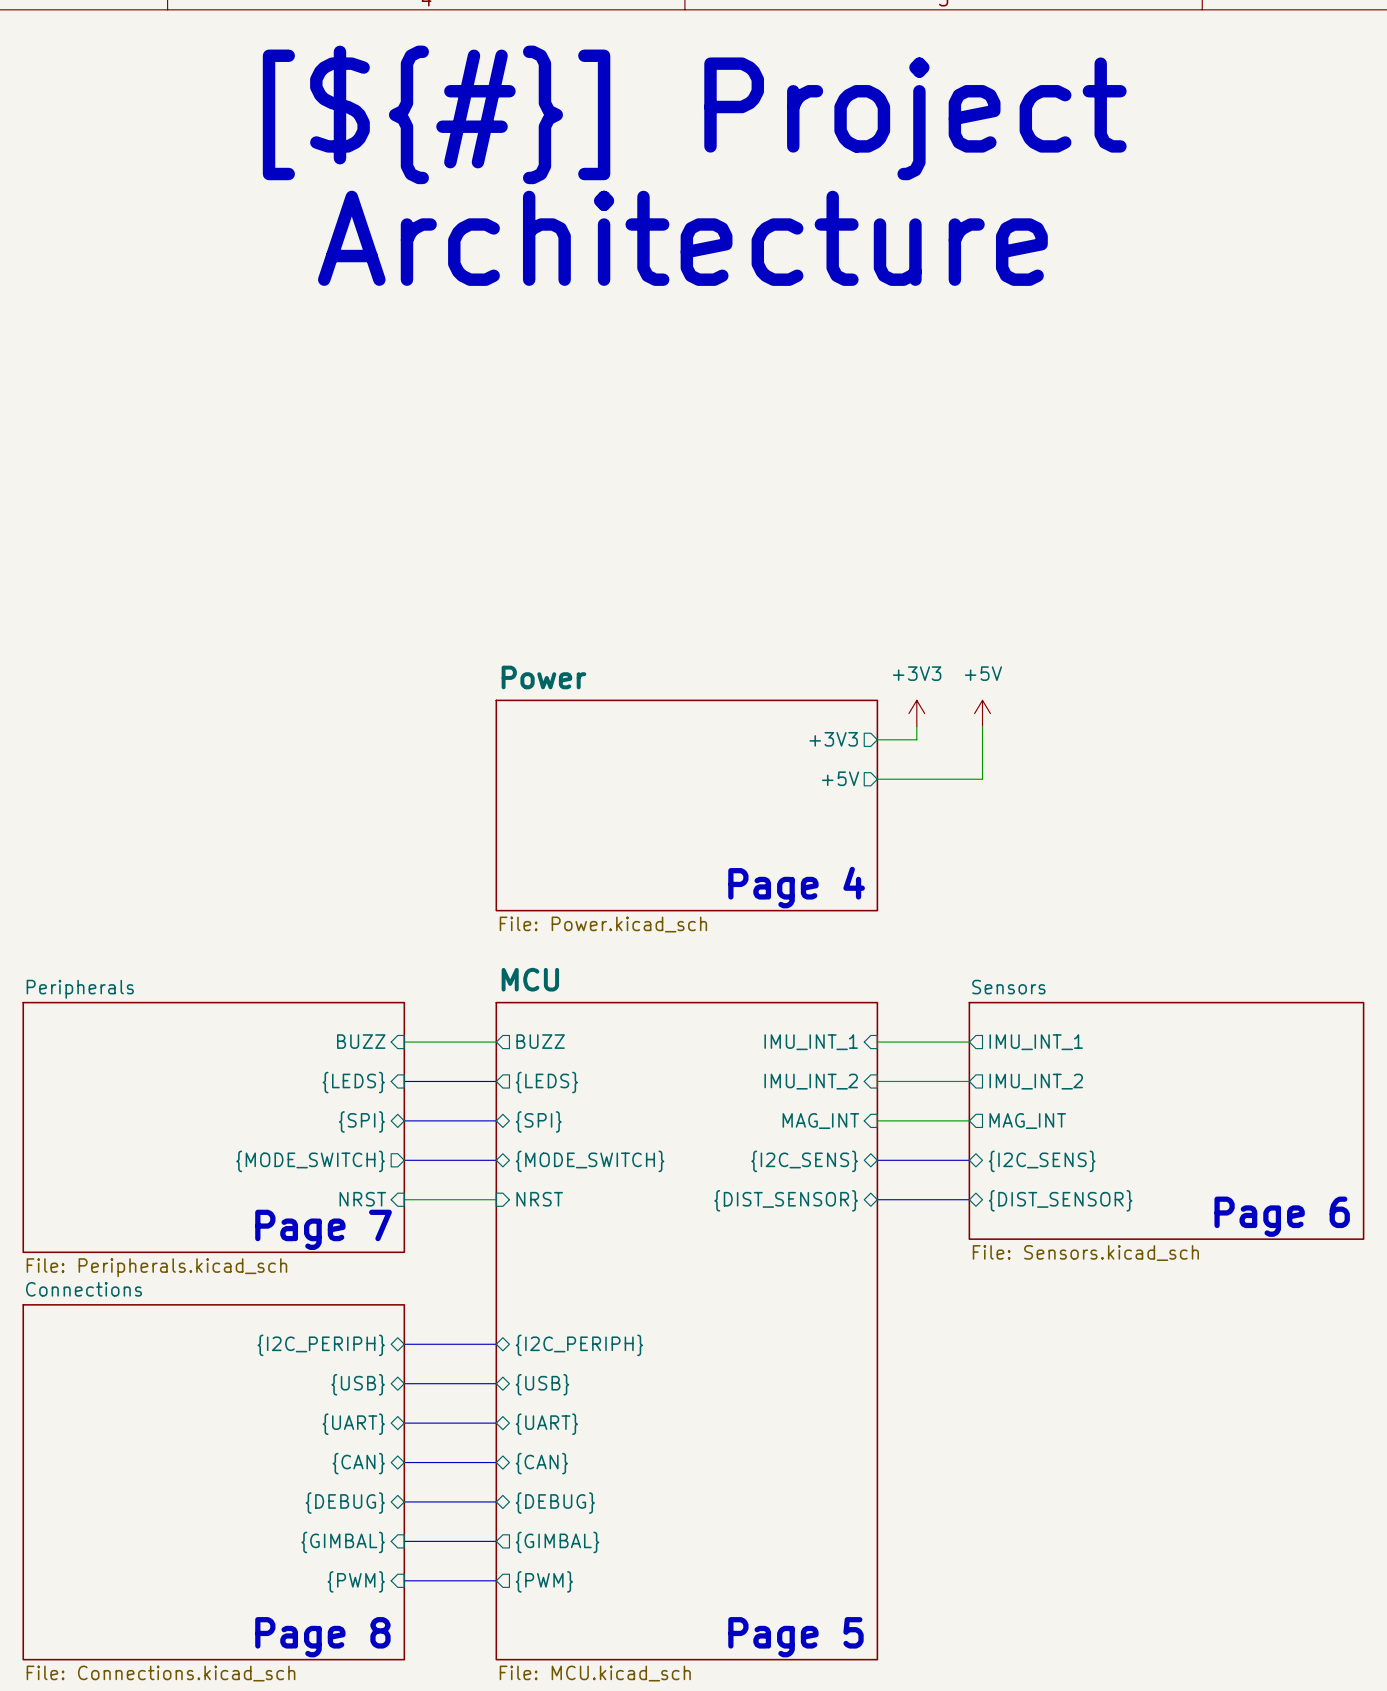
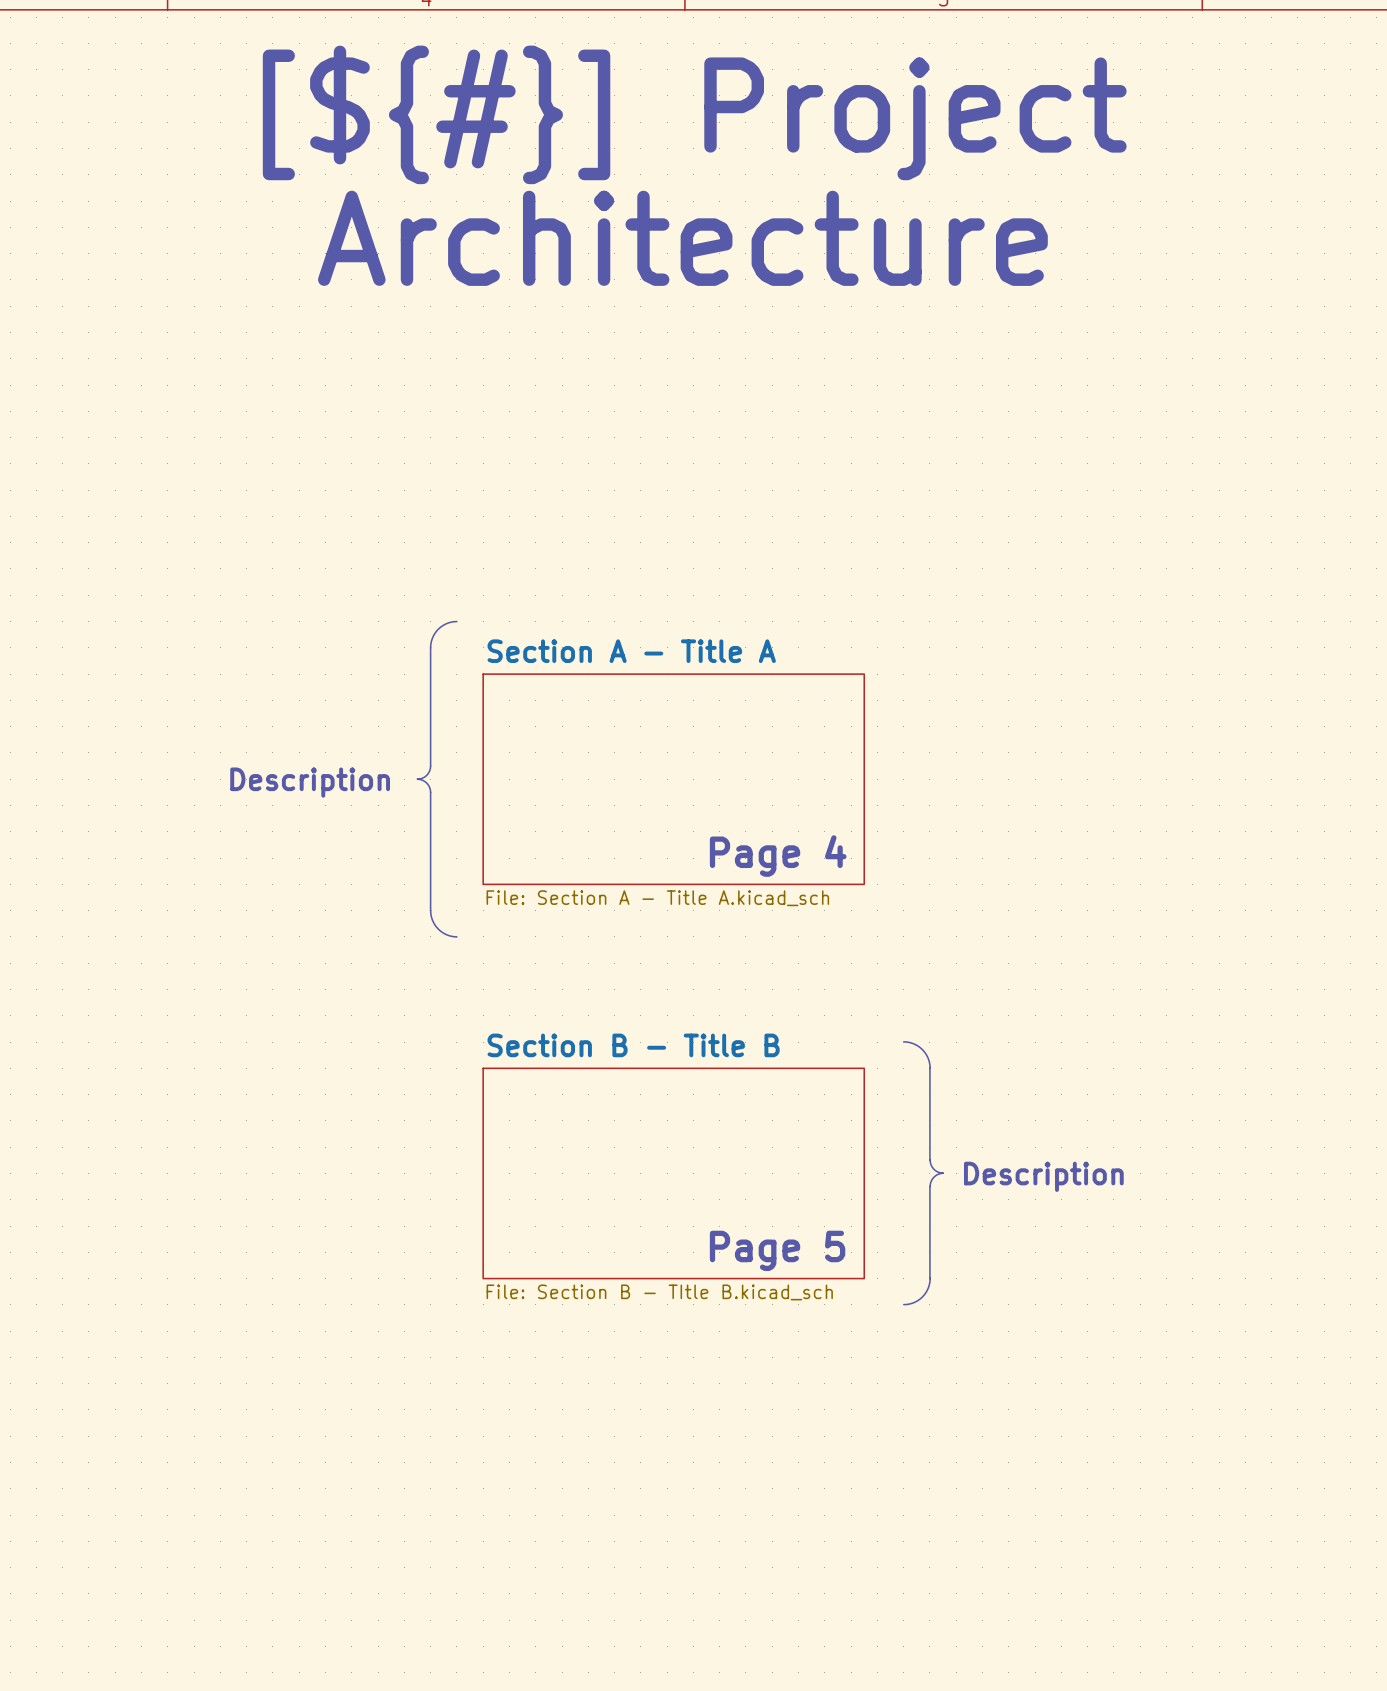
line: none -> (456, 621) (440, 627) (431, 641) (430, 767) (425, 776) (417, 779) (425, 781) (430, 790) (431, 917) (440, 931) (456, 936)
power symbol: +3V3 (916, 713) -> none
power symbol: +5V (982, 713) -> none
wire: (916, 726) (916, 739) (877, 739) -> none
wire: (982, 726) (982, 779) (877, 779) -> none
sheet pin: +3V3 (833, 739) -> none
sheet pin: +5V (840, 778) -> none
sheet Section A - Title A: none -> File: Section A - Title A.kicad_sch (673, 779)
text: none -> Description (310, 782)
sheet Power: File: Power.kicad_sch (686, 805) -> none
text position: Page 4 (796, 887) -> Page 4 (778, 856)
sheet pin: BUZZ (361, 1041) -> none
sheet pin: BUZZ (540, 1041) -> none
line: none -> (903, 1041) (913, 1043) (922, 1049) (928, 1058) (930, 1068)
wire: (404, 1042) (496, 1042) -> none
sheet pin: IMU_INT_1 (811, 1042) -> none
wire: (877, 1042) (969, 1042) -> none
sheet pin: IMU_INT_1 (1036, 1042) -> none
line: none -> (929, 1068) (929, 1160)
bus: (404, 1081) (496, 1081) -> none
sheet pin: IMU_INT_2 (811, 1081) -> none
wire: (877, 1081) (969, 1081) -> none
sheet pin: IMU_INT_2 (1036, 1081) -> none
sheet pin: {LEDS} (353, 1082) -> none
sheet pin: {LEDS} (546, 1082) -> none
bus: (404, 1120) (496, 1120) -> none
wire: (877, 1120) (969, 1120) -> none
sheet Sensors: File: Sensors.kicad_sch (1166, 1120) -> none
sheet pin: {SPI} (361, 1121) -> none
sheet pin: {SPI} (538, 1121) -> none
sheet pin: MAG_INT (820, 1121) -> none
sheet pin: MAG_INT (1027, 1121) -> none
sheet Peripherals: File: Peripherals.kicad_sch (213, 1127) -> none
bus: (404, 1160) (496, 1160) -> none
bus: (877, 1160) (969, 1160) -> none
line: none -> (930, 1160) (934, 1169) (943, 1173) (934, 1177) (930, 1186)
sheet pin: {MODE_SWITCH} (310, 1161) -> none
sheet pin: {MODE_SWITCH} (590, 1161) -> none
sheet pin: {I2C_SENS} (804, 1161) -> none
sheet pin: {I2C_SENS} (1042, 1161) -> none
sheet Section B - Title B: none -> File: Section B - TItle B.kicad_sch (673, 1173)
text: none -> Description (1043, 1176)
line: none -> (929, 1186) (929, 1278)
sheet pin: NRST (362, 1199) -> none
wire: (404, 1199) (496, 1199) -> none
sheet pin: NRST (539, 1199) -> none
bus: (877, 1199) (969, 1199) -> none
sheet pin: {DIST_SENSOR} (786, 1200) -> none
sheet pin: {DIST_SENSOR} (1060, 1200) -> none
text: Page 6 (1282, 1216) -> none
text: Page 7 (323, 1229) -> none
text: none -> Page 5 (777, 1250)
line: none -> (930, 1278) (928, 1287) (922, 1296) (912, 1303) (903, 1304)
sheet MCU: File: MCU.kicad_sch (686, 1331) -> none
bus: (404, 1344) (496, 1344) -> none
sheet pin: {I2C_PERIPH} (321, 1345) -> none
sheet pin: {I2C_PERIPH} (579, 1345) -> none
bus: (404, 1383) (496, 1383) -> none
sheet pin: {USB} (358, 1384) -> none
sheet pin: {USB} (542, 1384) -> none
bus: (404, 1423) (496, 1423) -> none
sheet pin: {UART} (353, 1424) -> none
sheet pin: {UART} (546, 1424) -> none
bus: (404, 1462) (496, 1462) -> none
sheet pin: {CAN} (358, 1463) -> none
sheet pin: {CAN} (541, 1463) -> none
sheet Connections: File: Connections.kicad_sch (213, 1482) -> none
bus: (404, 1501) (496, 1501) -> none
sheet pin: {DEBUG} (345, 1503) -> none
sheet pin: {DEBUG} (555, 1503) -> none
bus: (404, 1541) (496, 1541) -> none
sheet pin: {GIMBAL} (343, 1542) -> none
sheet pin: {GIMBAL} (557, 1542) -> none
bus: (404, 1580) (496, 1580) -> none
sheet pin: {PWM} (356, 1581) -> none
sheet pin: {PWM} (544, 1581) -> none
text: Page 8 (322, 1637) -> none
text: Page 5 (795, 1637) -> none

